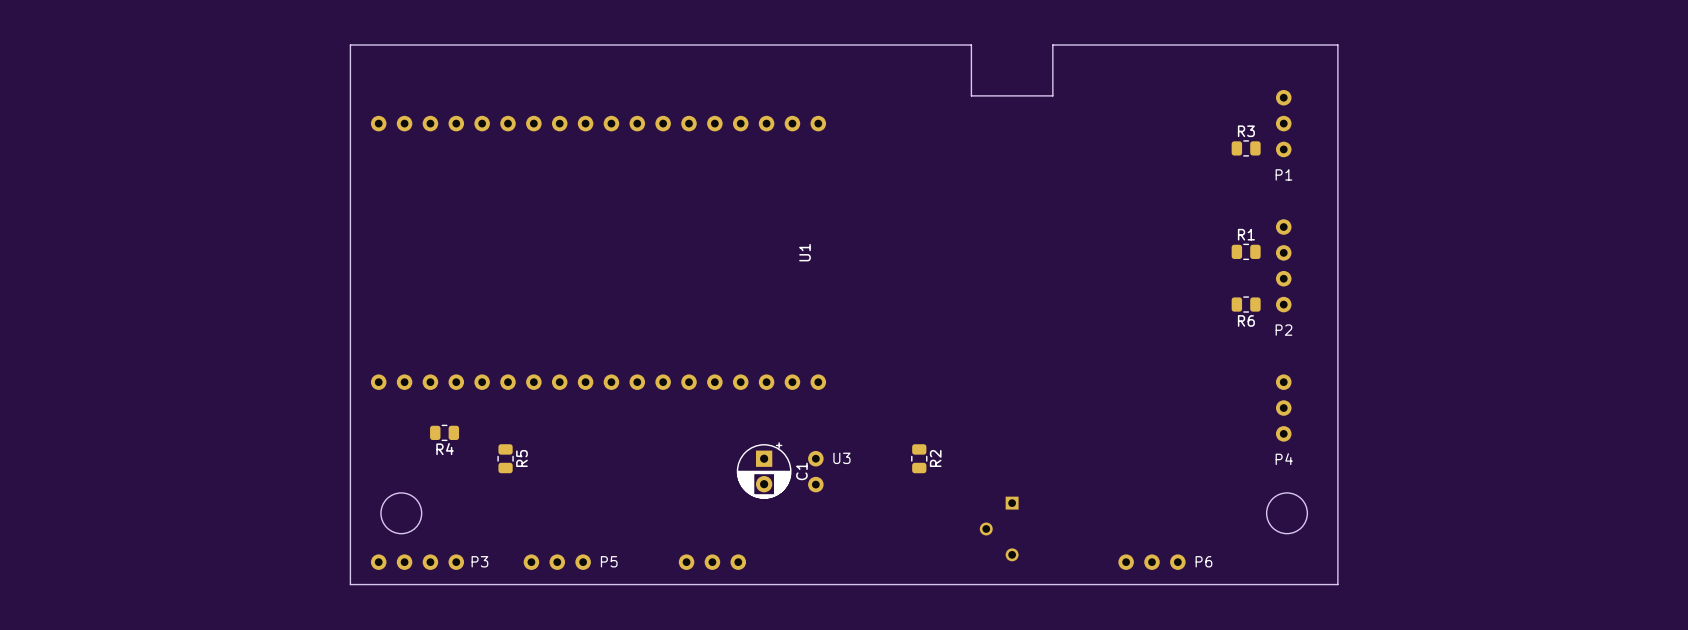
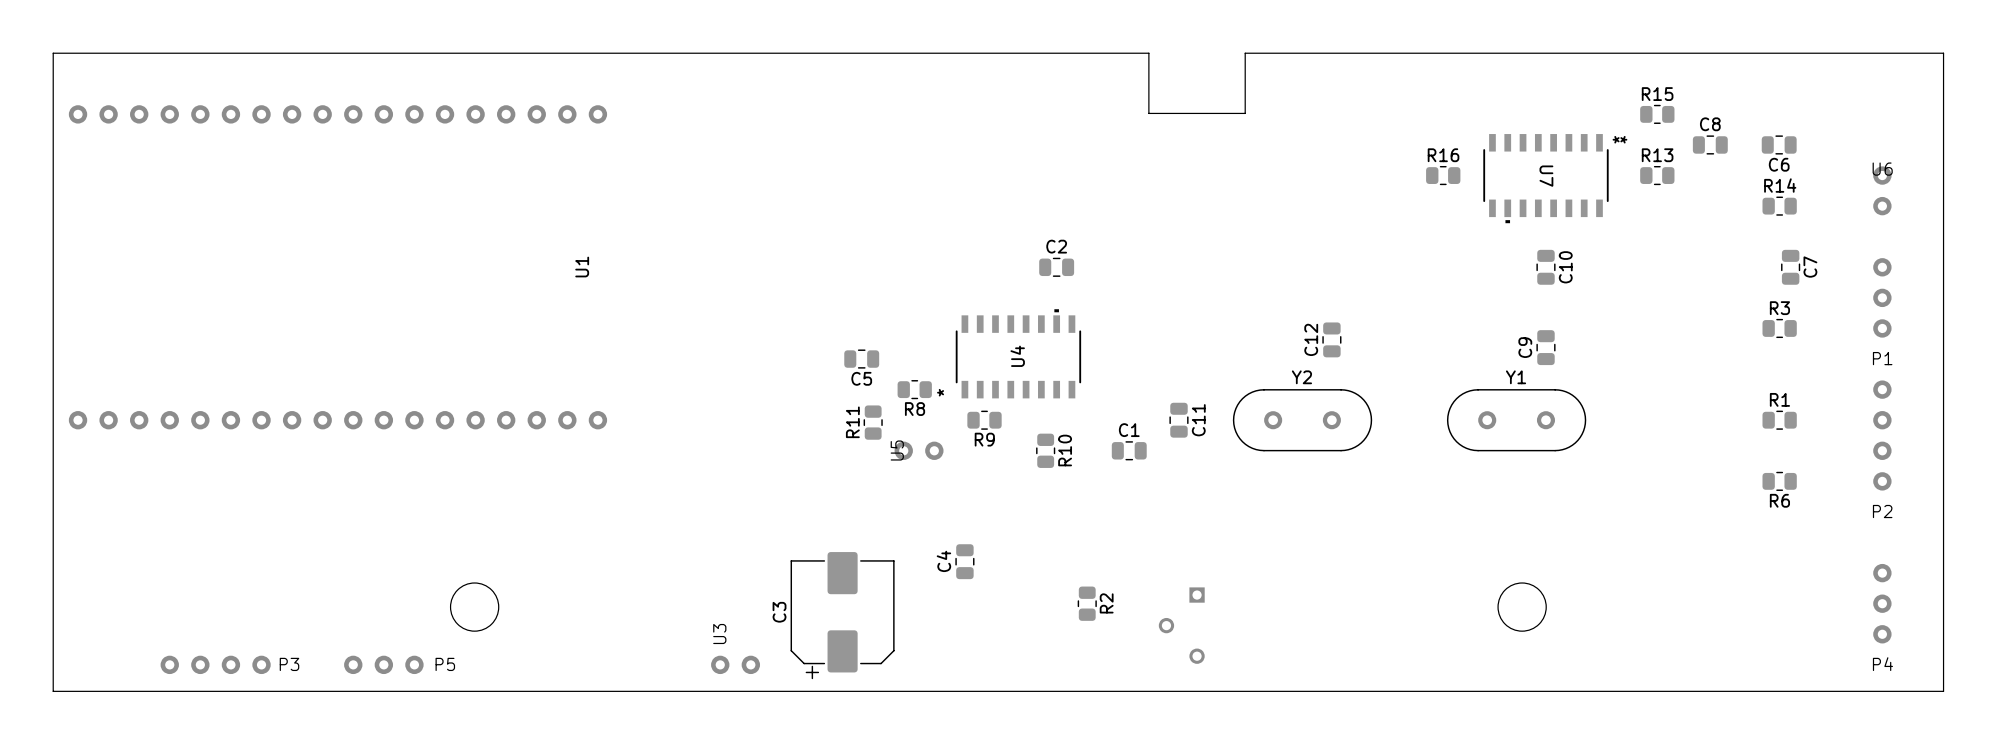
board edge: (350, 45) (350, 584) -> (414, 53) (53, 53) (53, 691) (414, 691)
board edge: (1337, 45) (1337, 584) -> (1582, 53) (1943, 53) (1943, 691) (1582, 691)
R15: none -> (1657, 114)
C8: none -> (1710, 144)
C6: none -> (1779, 144)
P1 position: (1283, 123) -> (1882, 297)
R16: none -> (1443, 175)
R3 position: (1246, 148) -> (1779, 328)
R13: none -> (1657, 175)
U7: none -> (1545, 178)
U6: none -> (1882, 190)
R14: none -> (1779, 206)
C2: none -> (1056, 267)
C10: none -> (1545, 267)
C7: none -> (1790, 267)
R1 position: (1246, 251) -> (1779, 420)
U1 position: (598, 252) -> (337, 267)
P2 position: (1283, 265) -> (1882, 435)
C12: none -> (1331, 339)
C9: none -> (1545, 347)
U4: none -> (1018, 353)
C5: none -> (861, 359)
R6 position: (1246, 304) -> (1779, 481)
R8: none -> (914, 389)
R9: none -> (984, 420)
C11: none -> (1178, 420)
Y2: none -> (1302, 420)
Y1: none -> (1516, 420)
R11: none -> (873, 422)
U5: none -> (919, 450)
R10: none -> (1045, 450)
P4 position: (1283, 408) -> (1882, 603)
R4: (444, 432) -> none
C1 footprint: [736, 442, 792, 499] -> [1111, 441, 1147, 461]
R5: (505, 458) -> none
U3 name position: U3 (841, 458) -> U3 (719, 634)
R2 position: (919, 458) -> (1087, 603)
C1 name position: C1 (801, 471) -> C1 (1129, 430)
U3 rotation: 0° (815, 471) -> 90° clockwise (735, 664)
U3 position: (815, 471) -> (735, 664)
C4: none -> (964, 561)
C3: none -> (842, 615)
P3 position: (417, 562) -> (215, 664)
P5 position: (557, 562) -> (383, 664)
part: (712, 562) -> none
P6: (1152, 562) -> none

